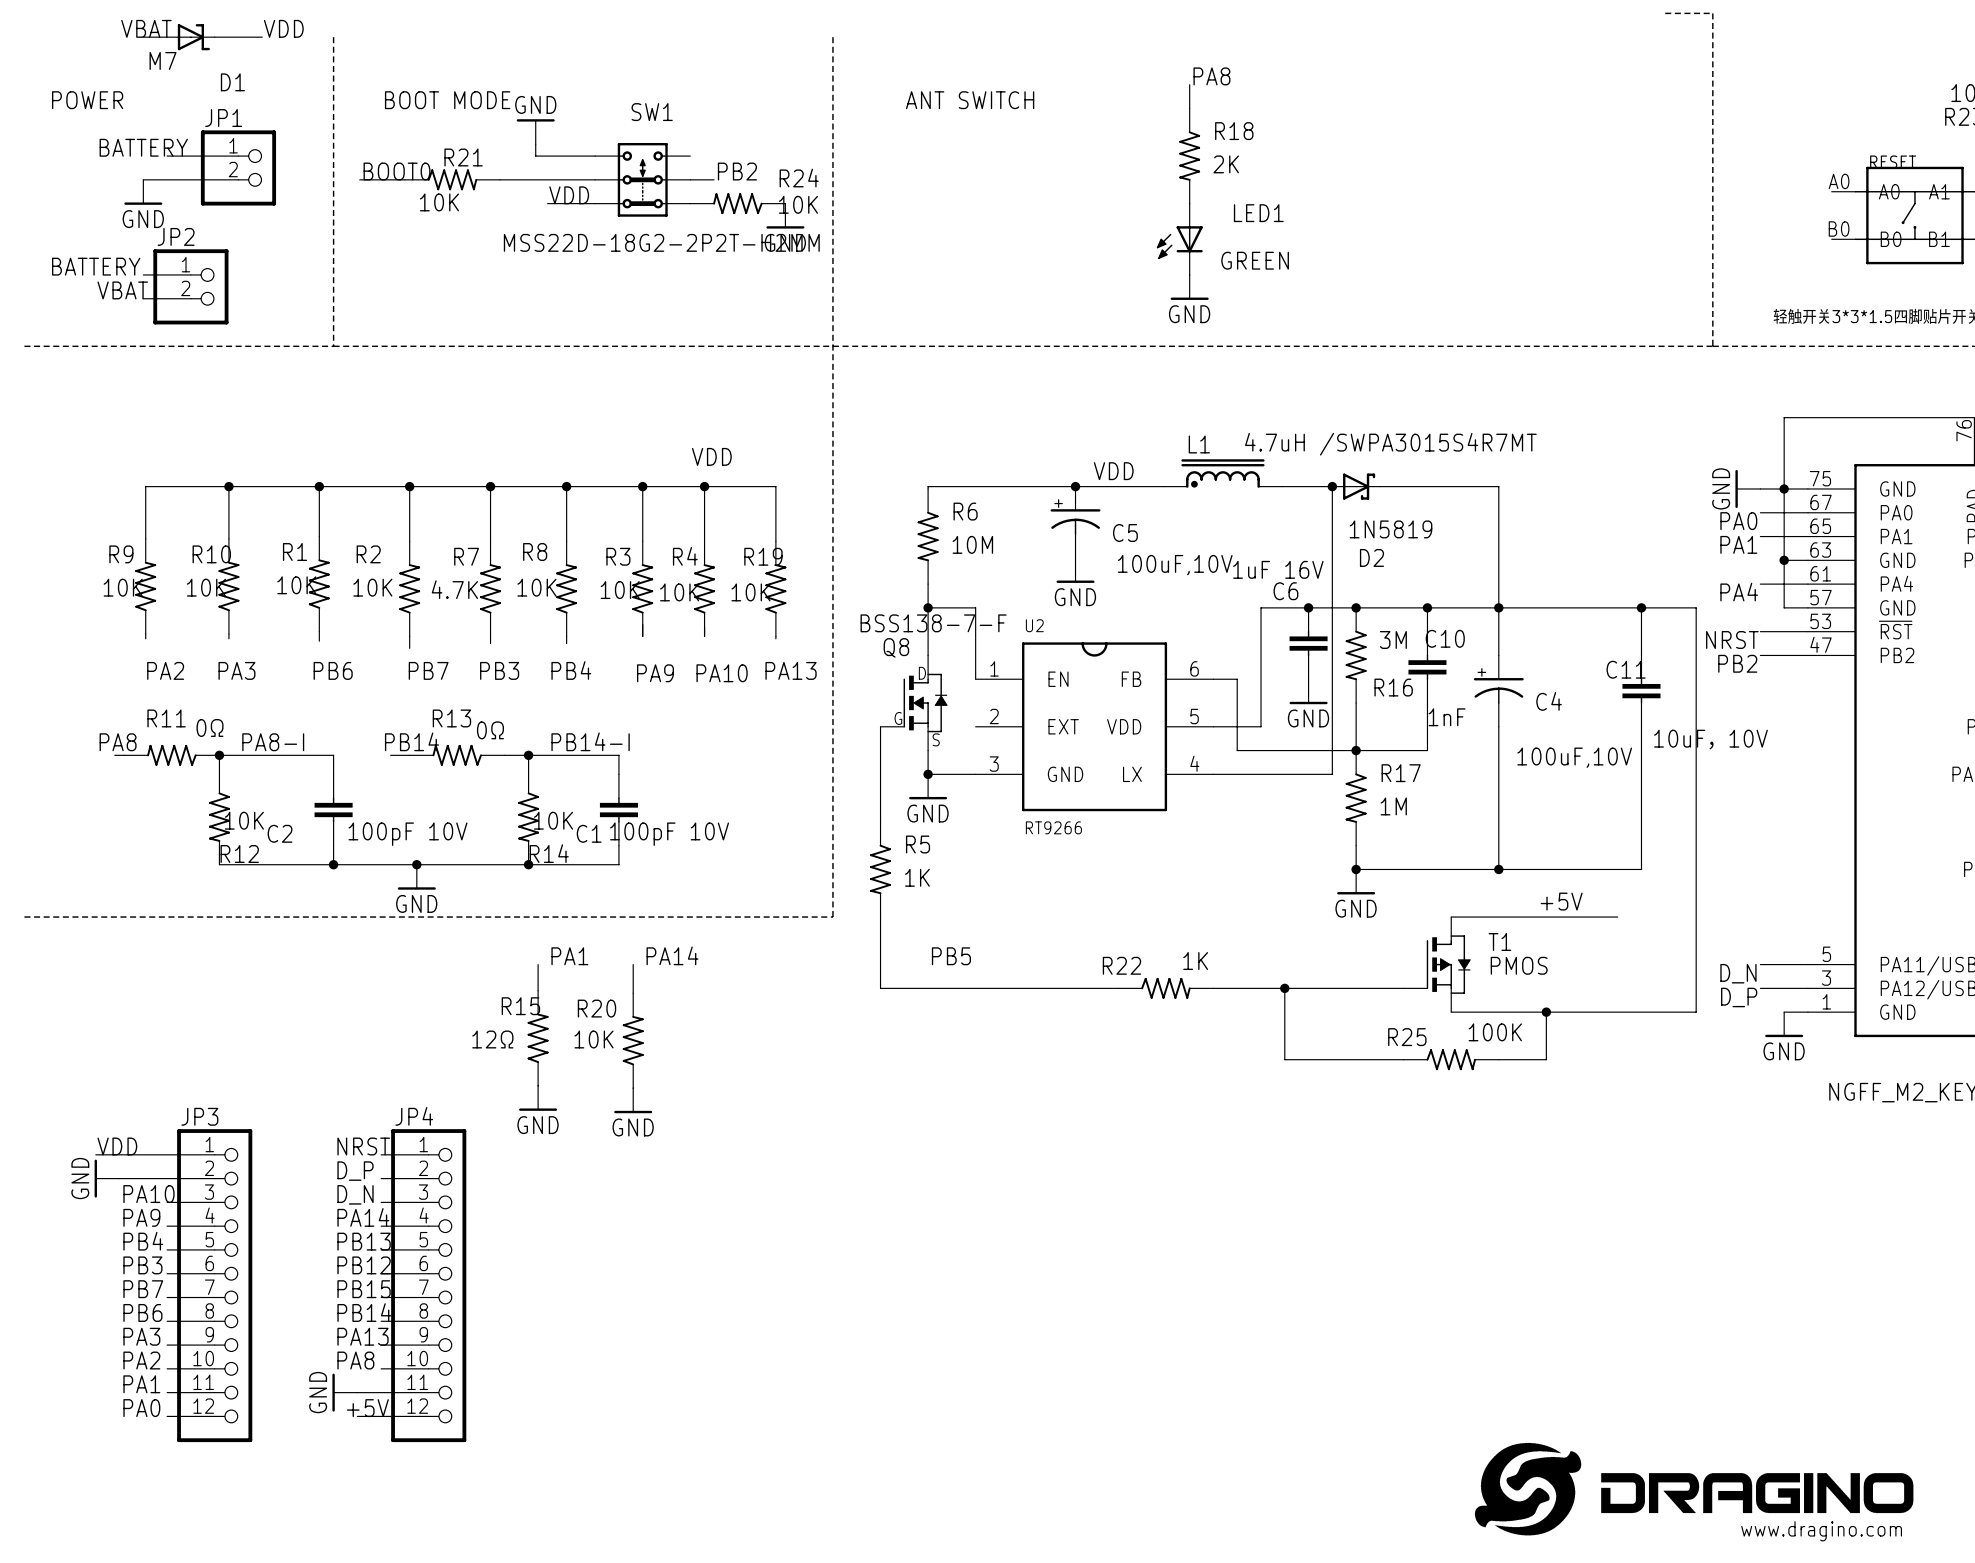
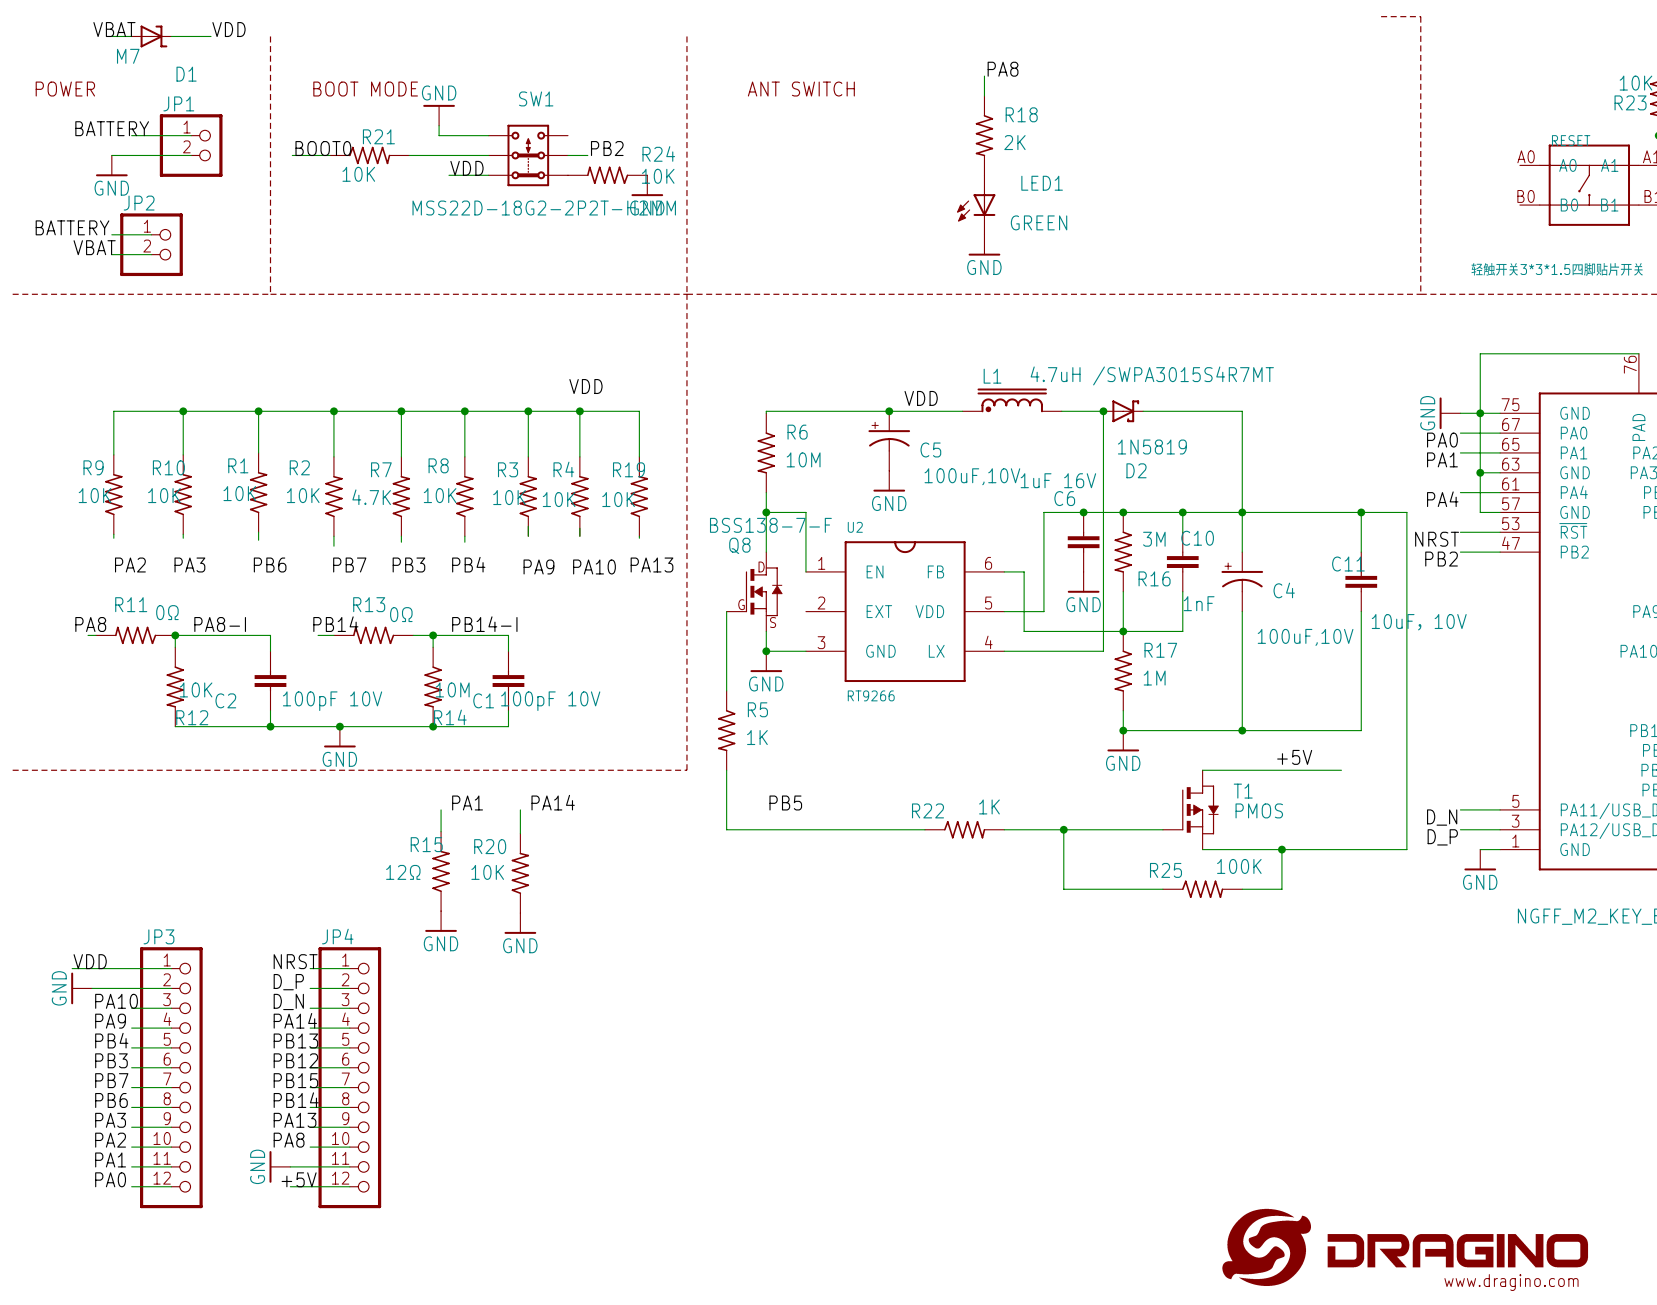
R14 value: 10K (553, 820) -> 10M (452, 689)

